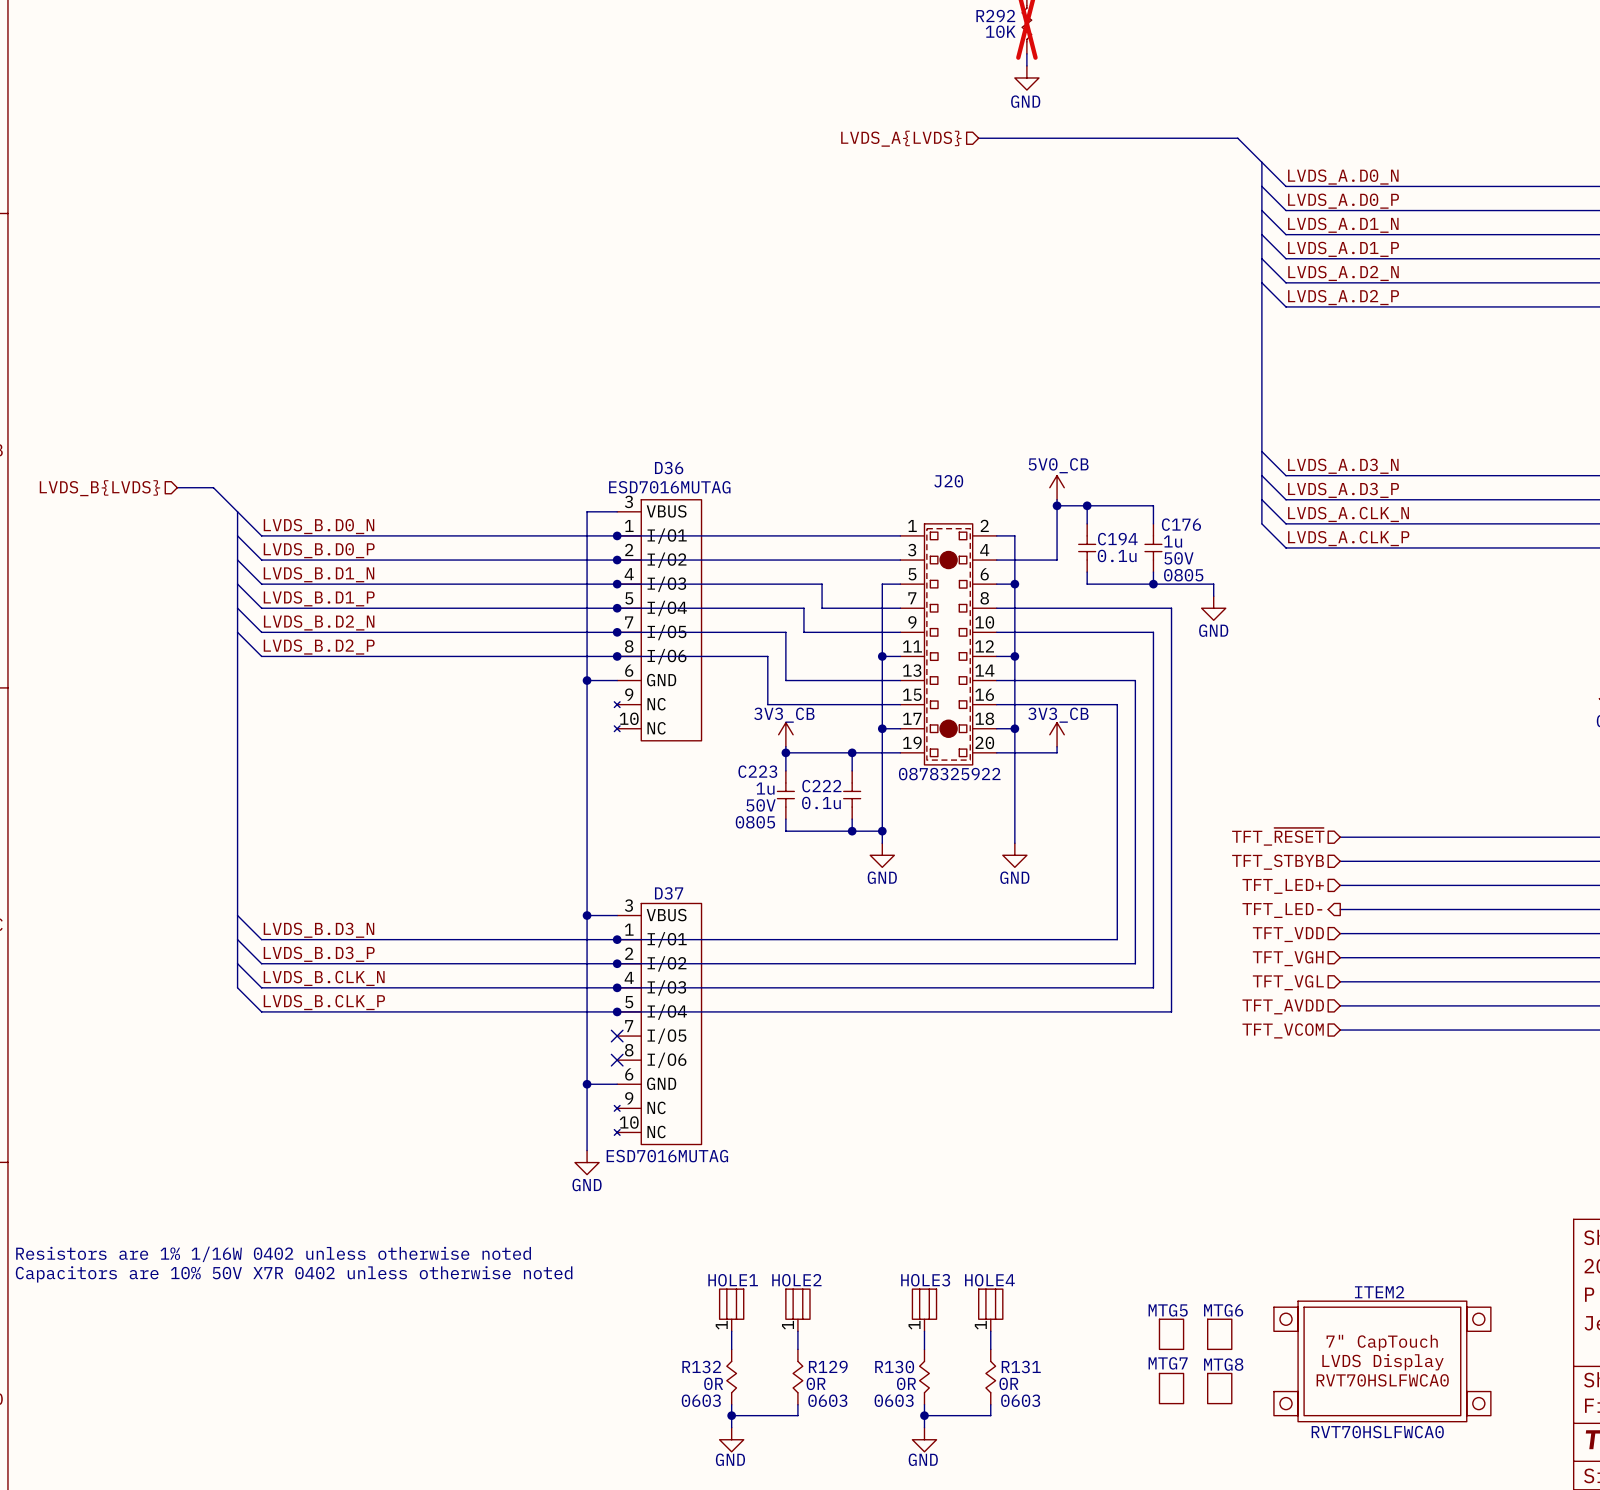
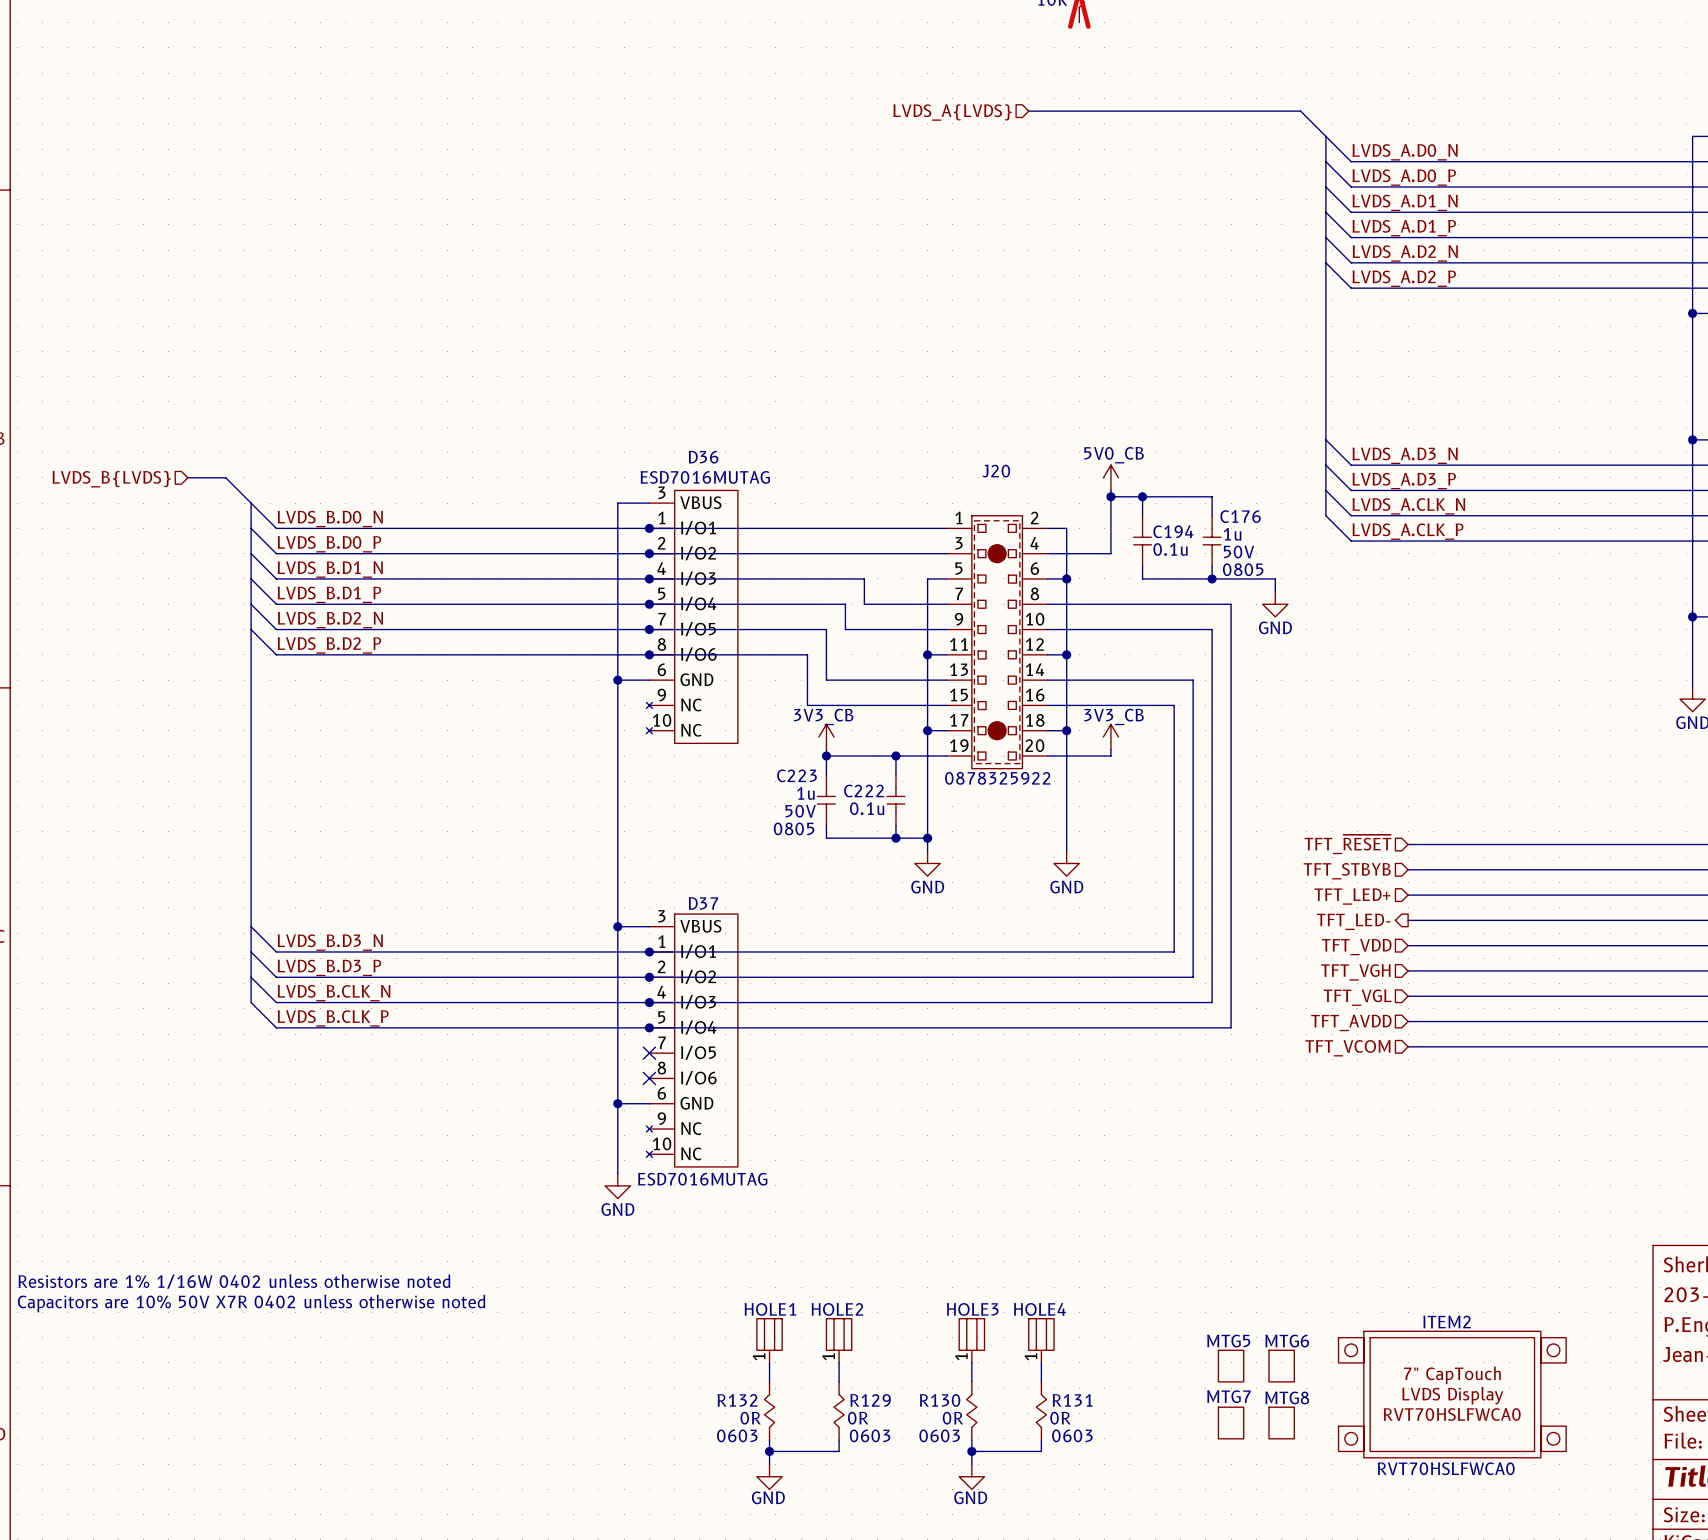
wire: (1026, 53) (1026, 65) -> none
power symbol: GND (1026, 77) -> none

